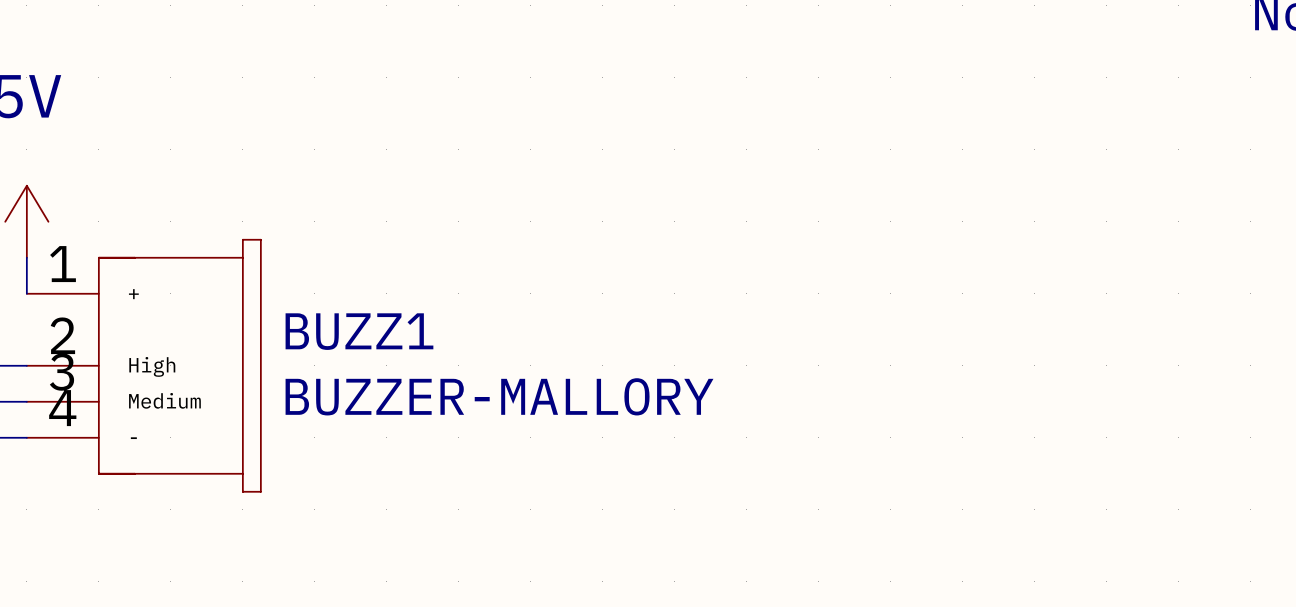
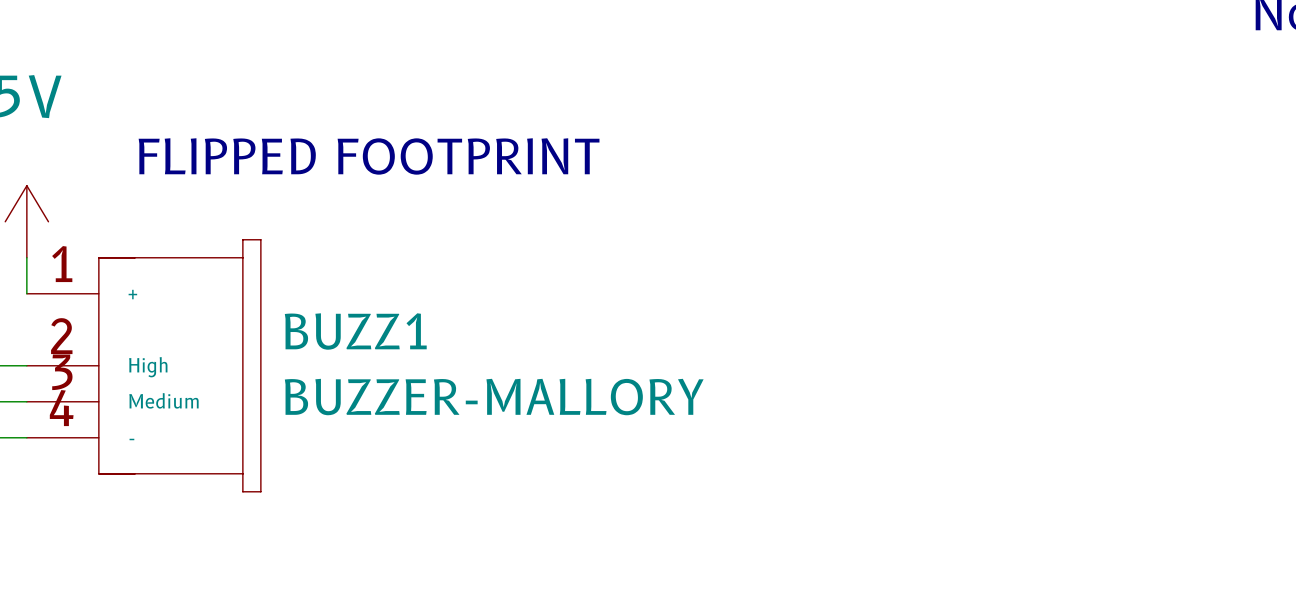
text: none -> FLIPPED FOOTPRINT (369, 156)

